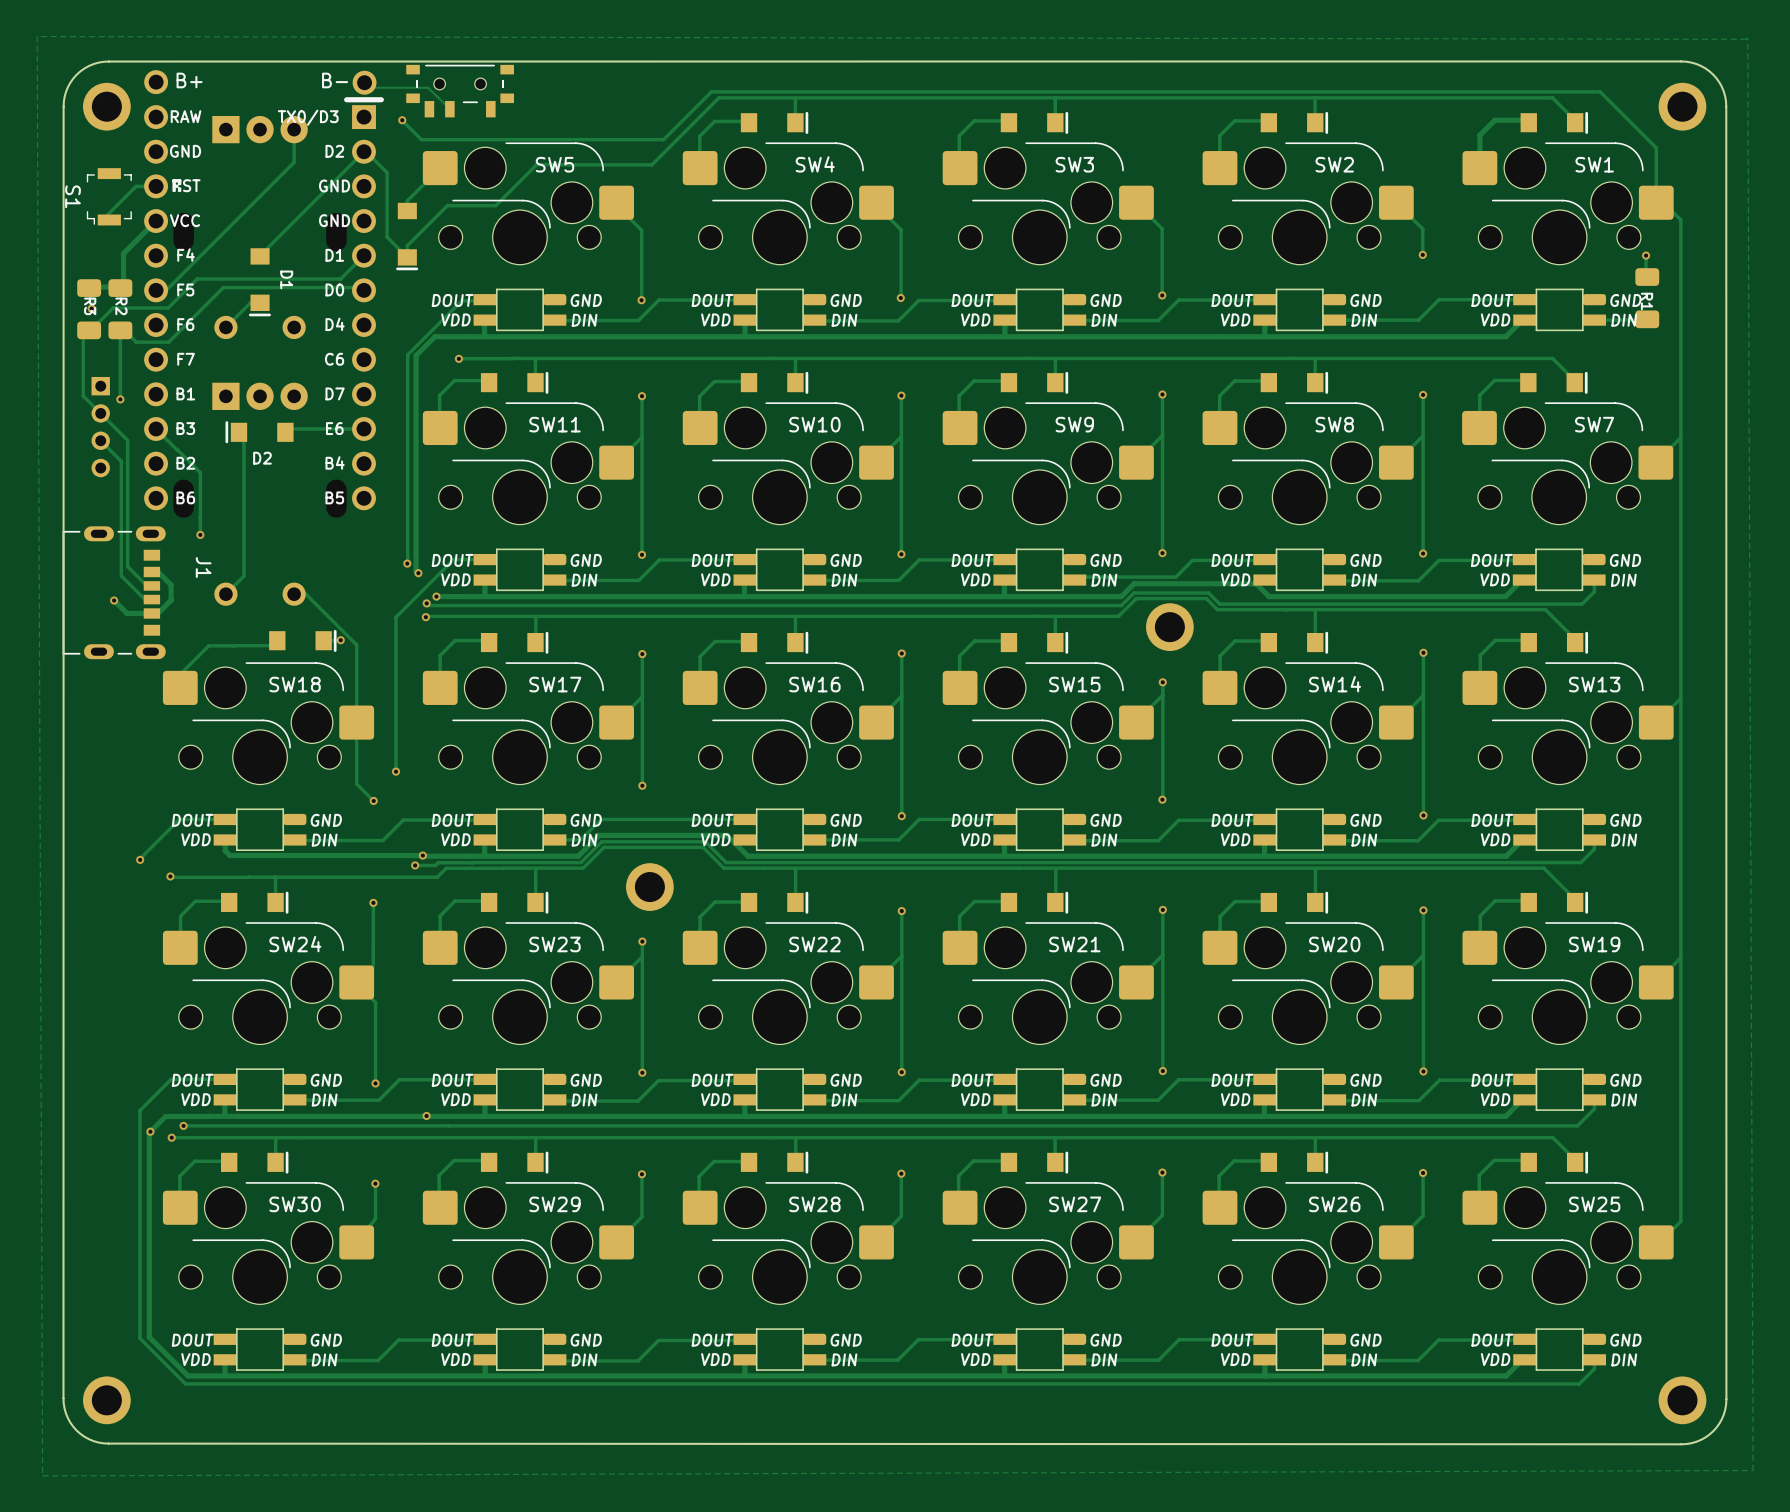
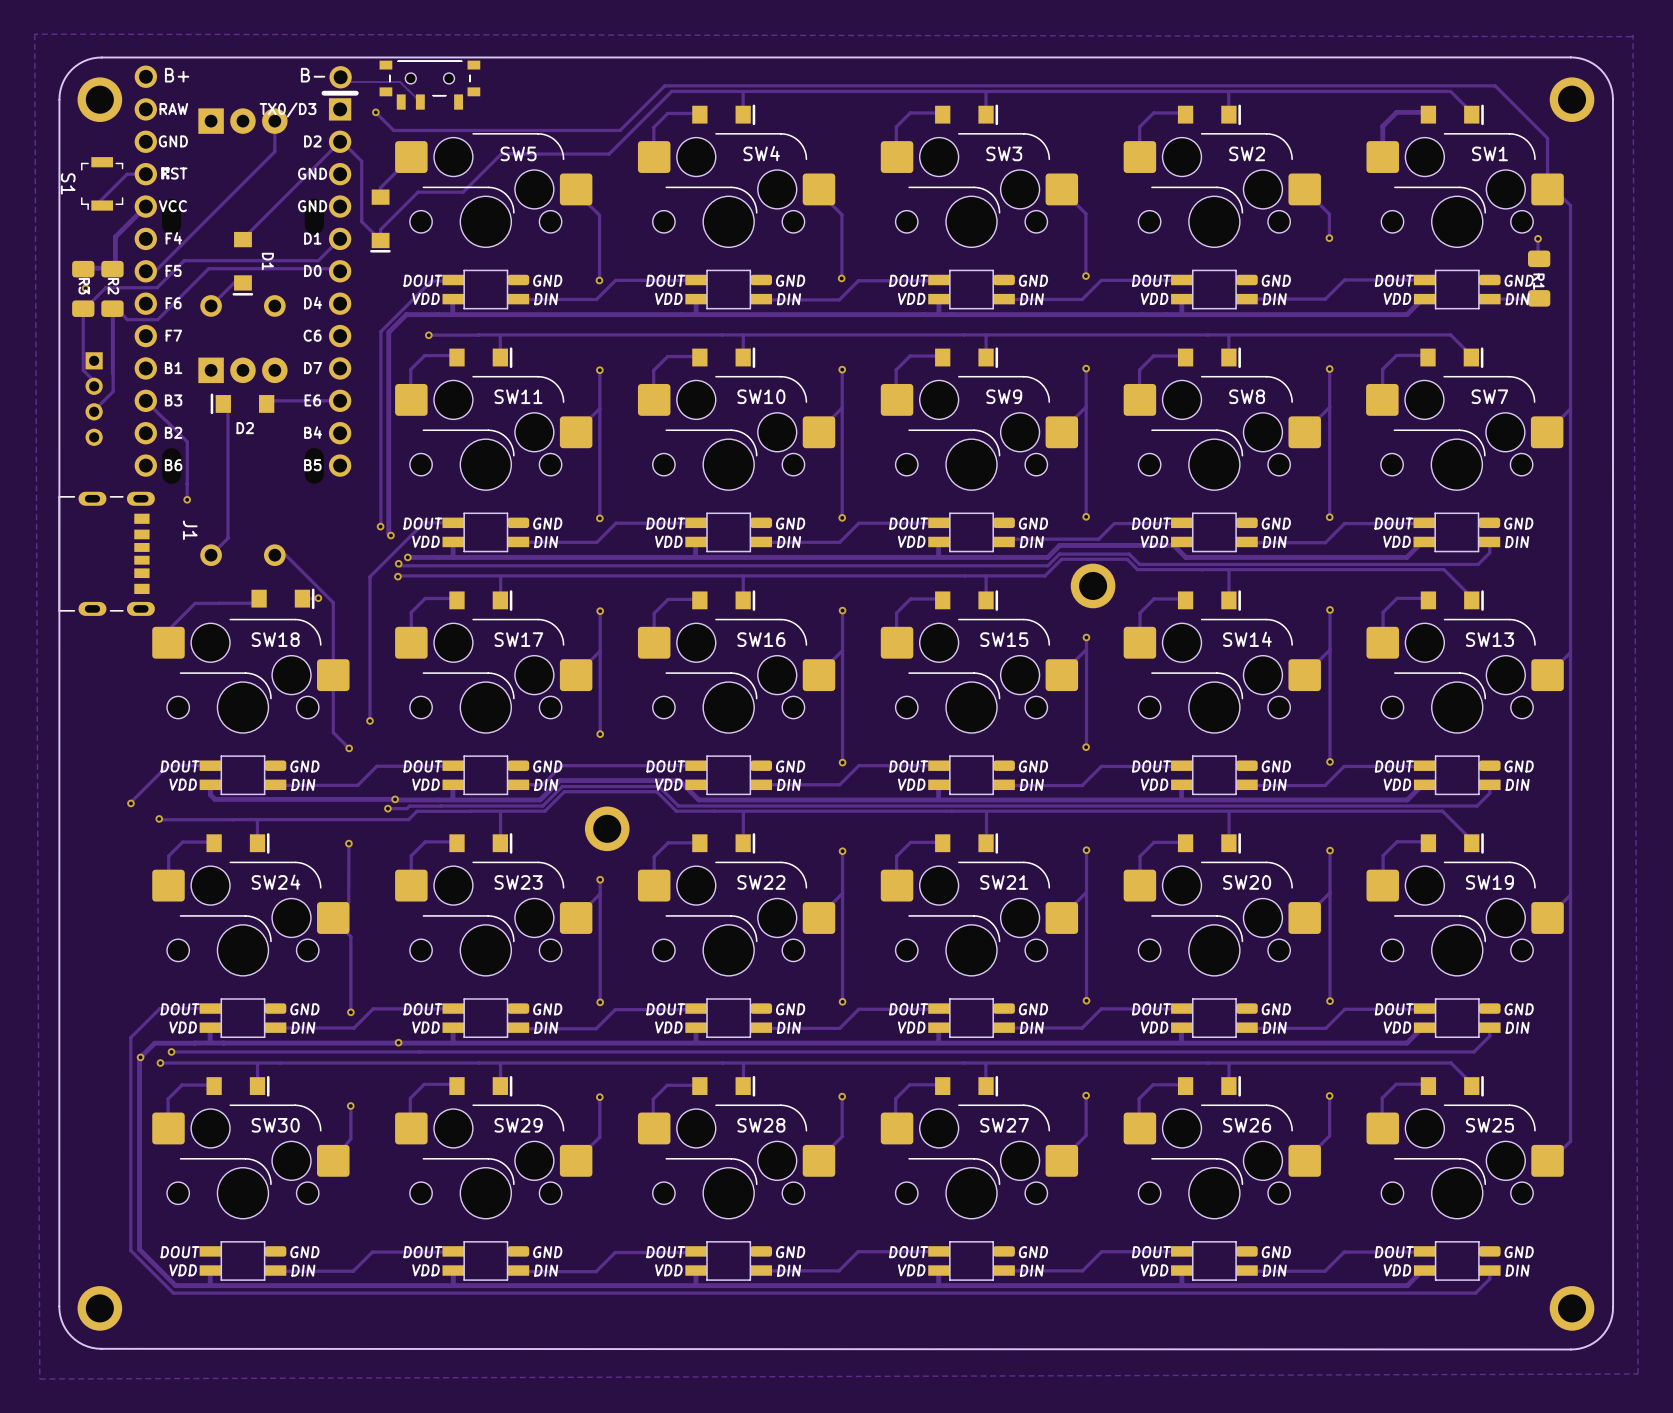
track: (89, 330) (83, 336) (83, 396) (127, 440) (127, 566) (146, 585) (151, 585) -> (83, 308) (83, 370) (98, 385)
track: none -> (113, 310) (113, 391) (93, 411)
via: (120, 399) -> none
track: (100, 440) (121, 461) (121, 575) (144, 599) (151, 599) -> none
track: (158, 572) (171, 584) (171, 600) (157, 613) -> none
track: (114, 600) (126, 613) -> none
via: (114, 600) -> none
track: (151, 613) (126, 613) -> none

